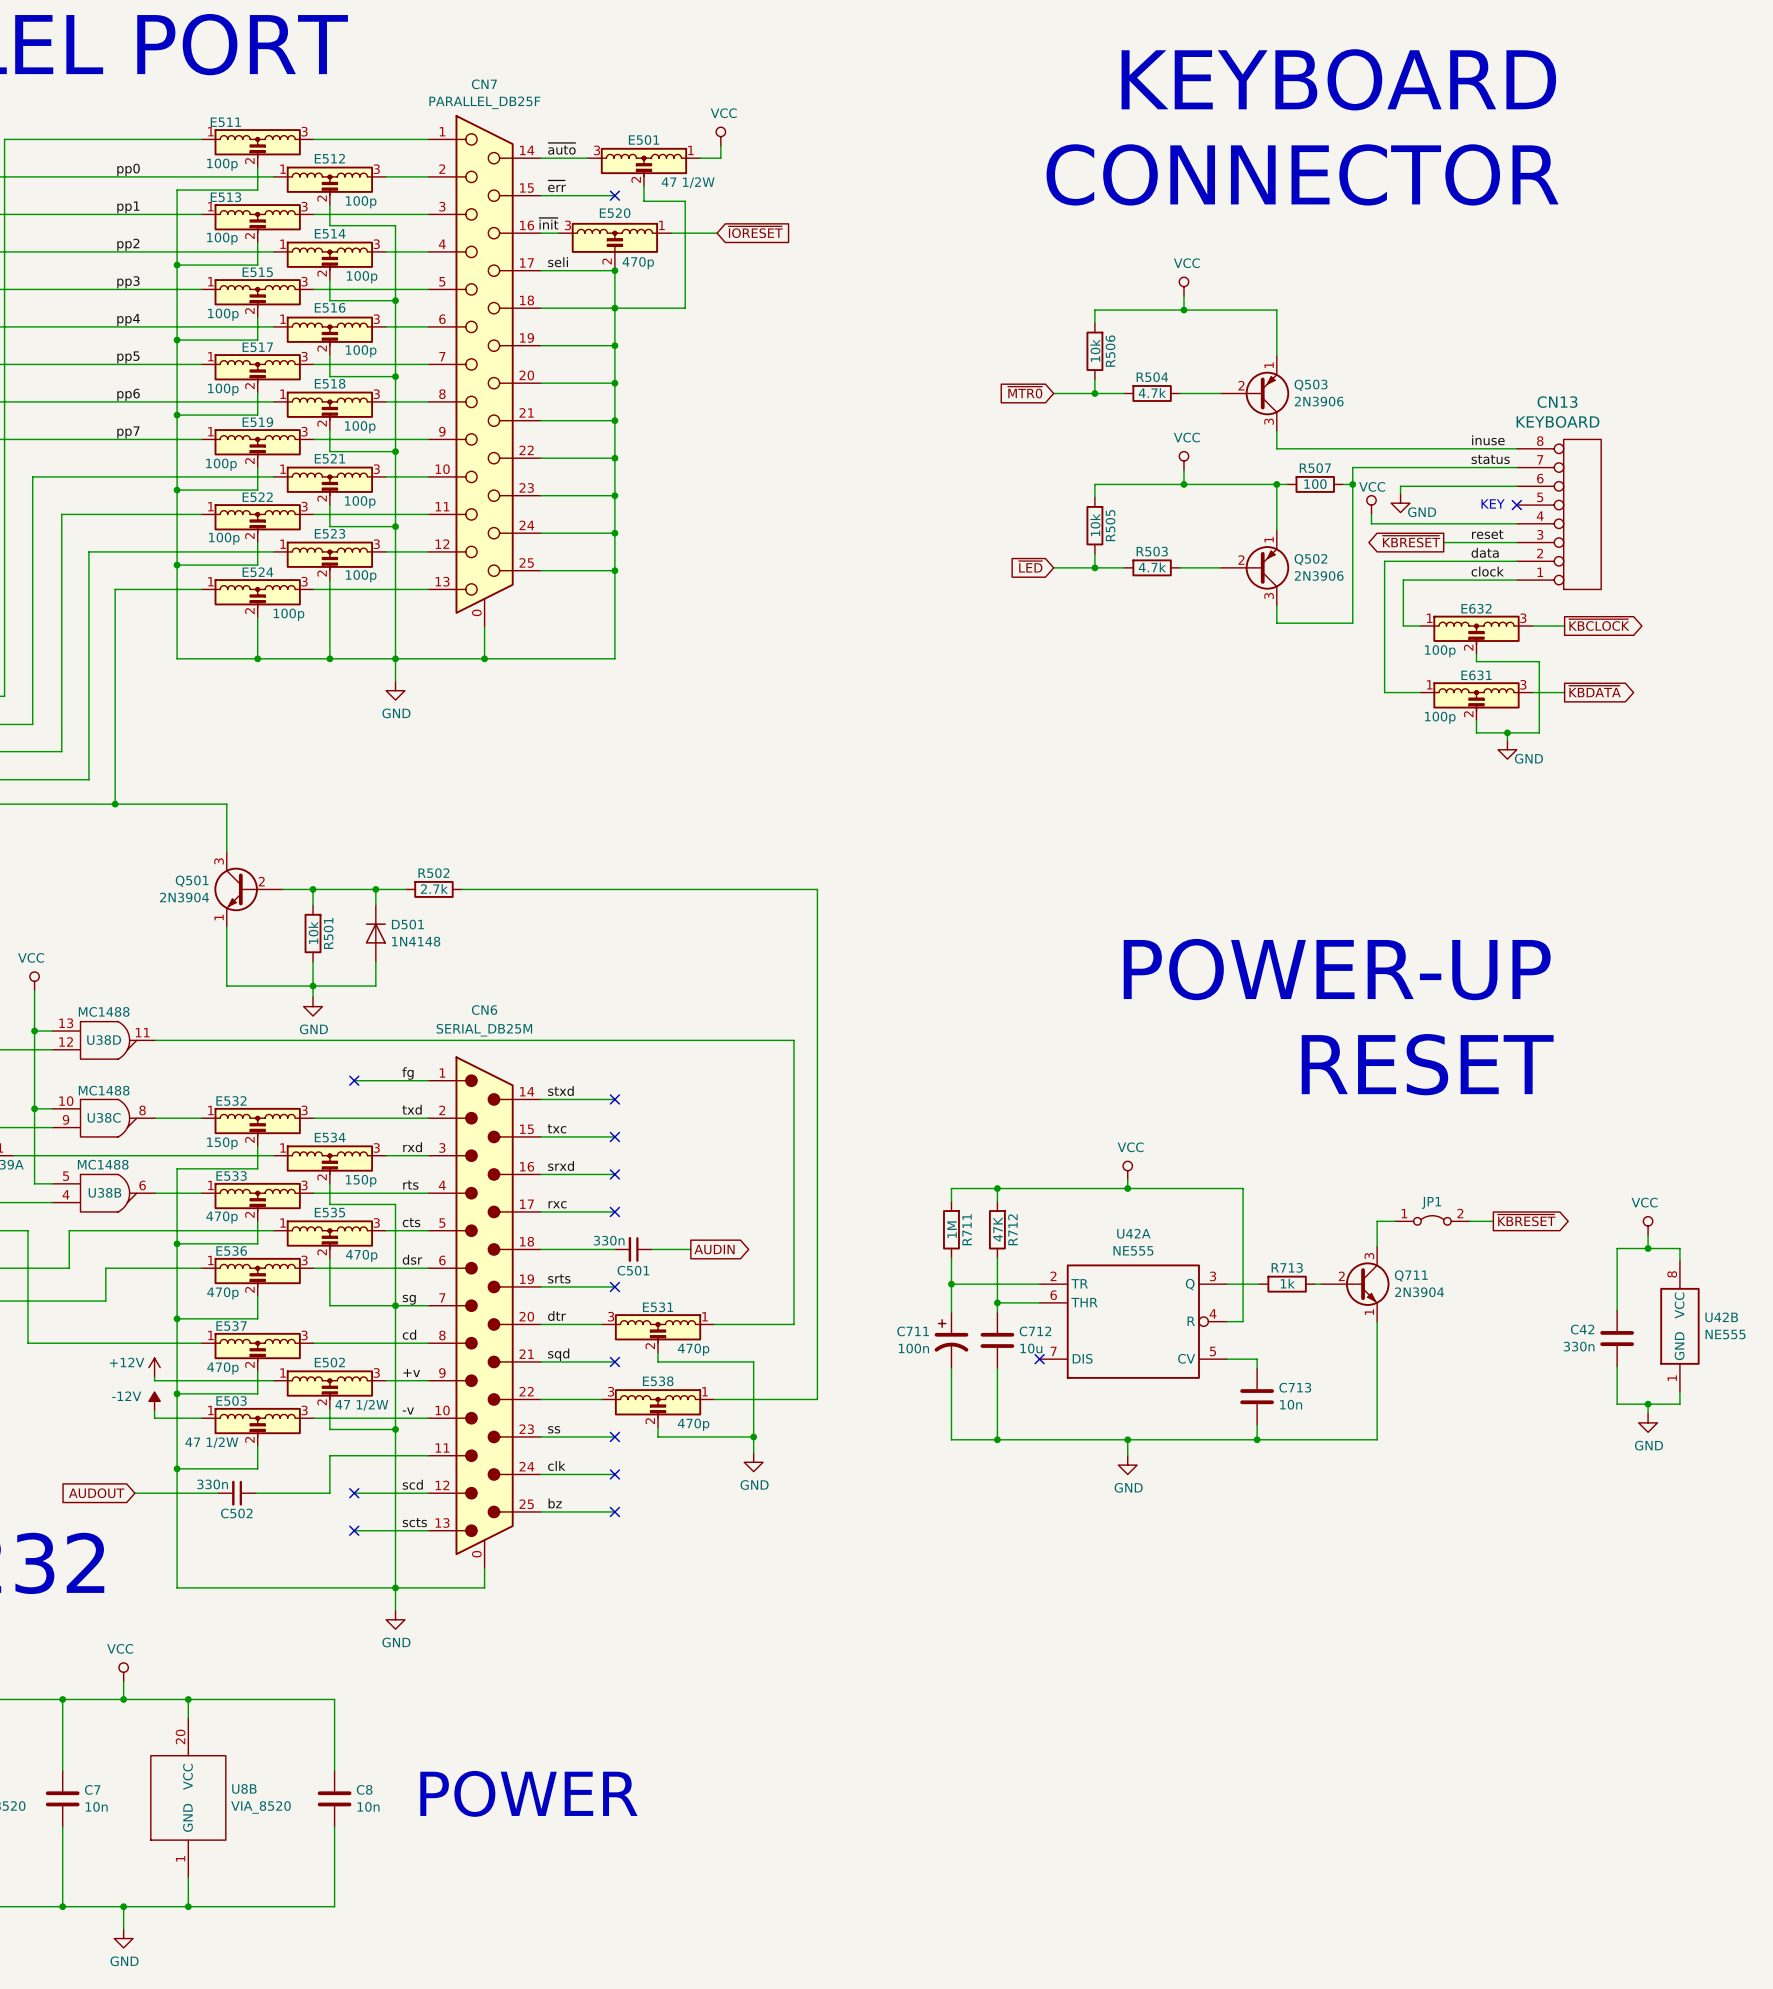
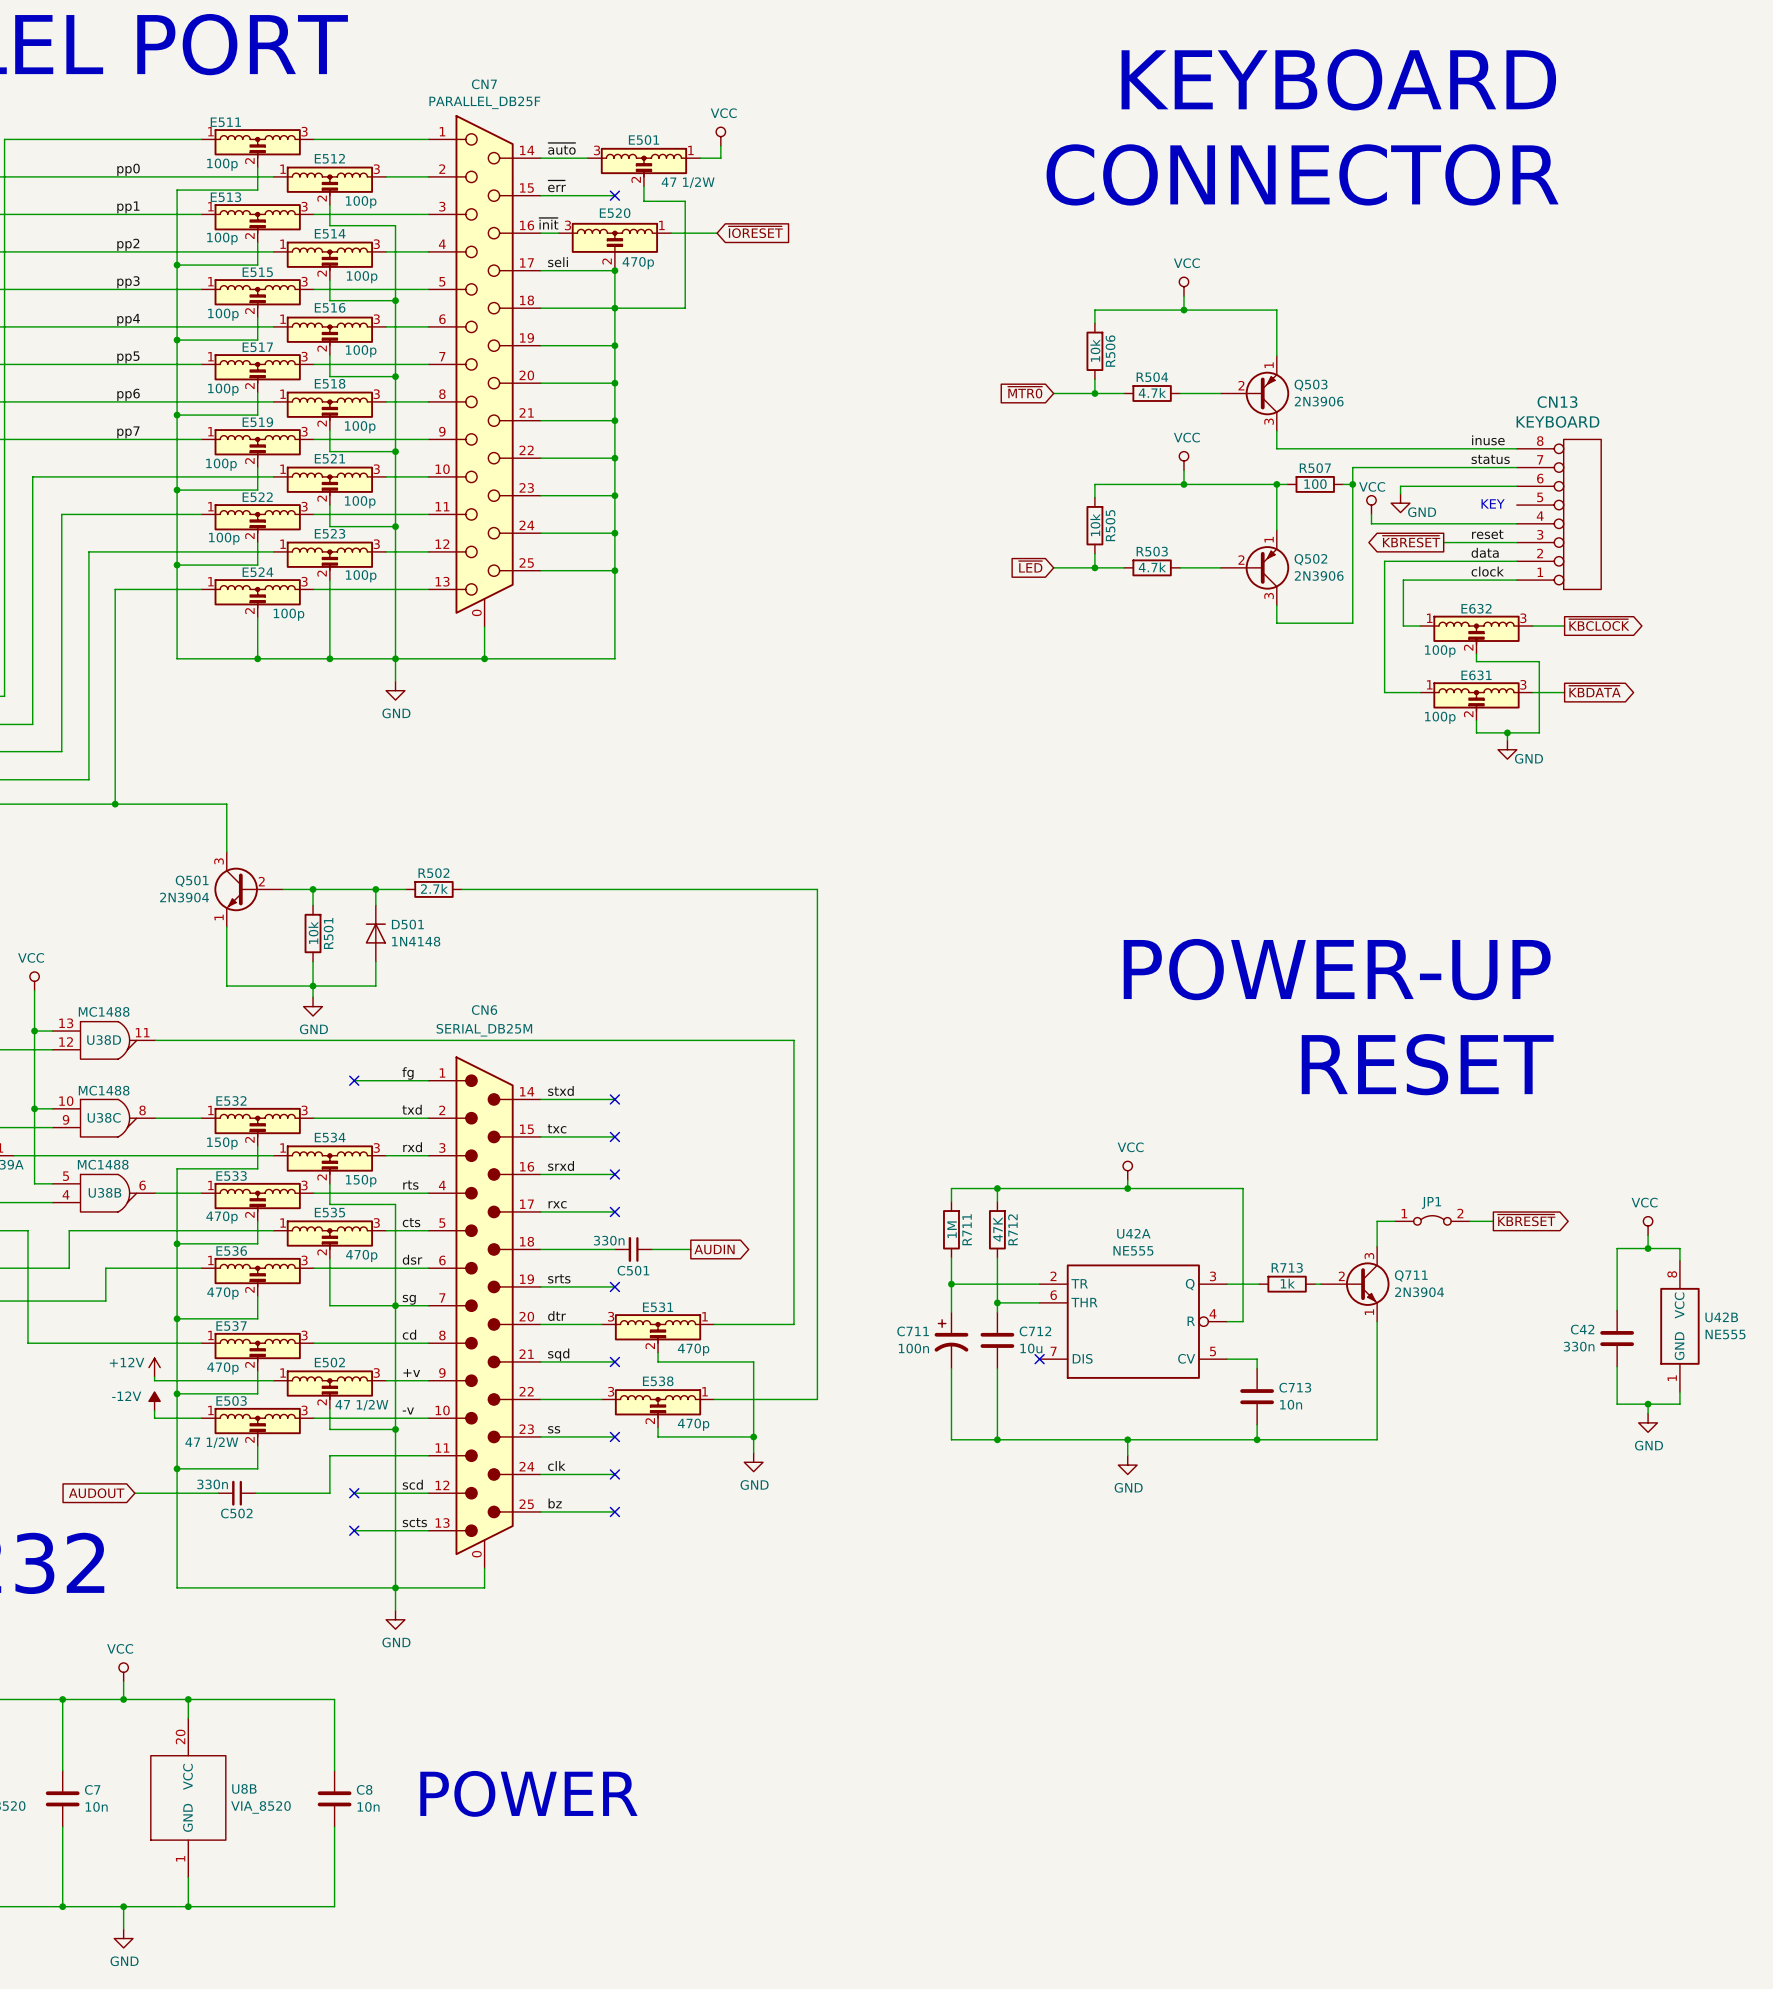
no-connect mark: (1516, 505) -> none

